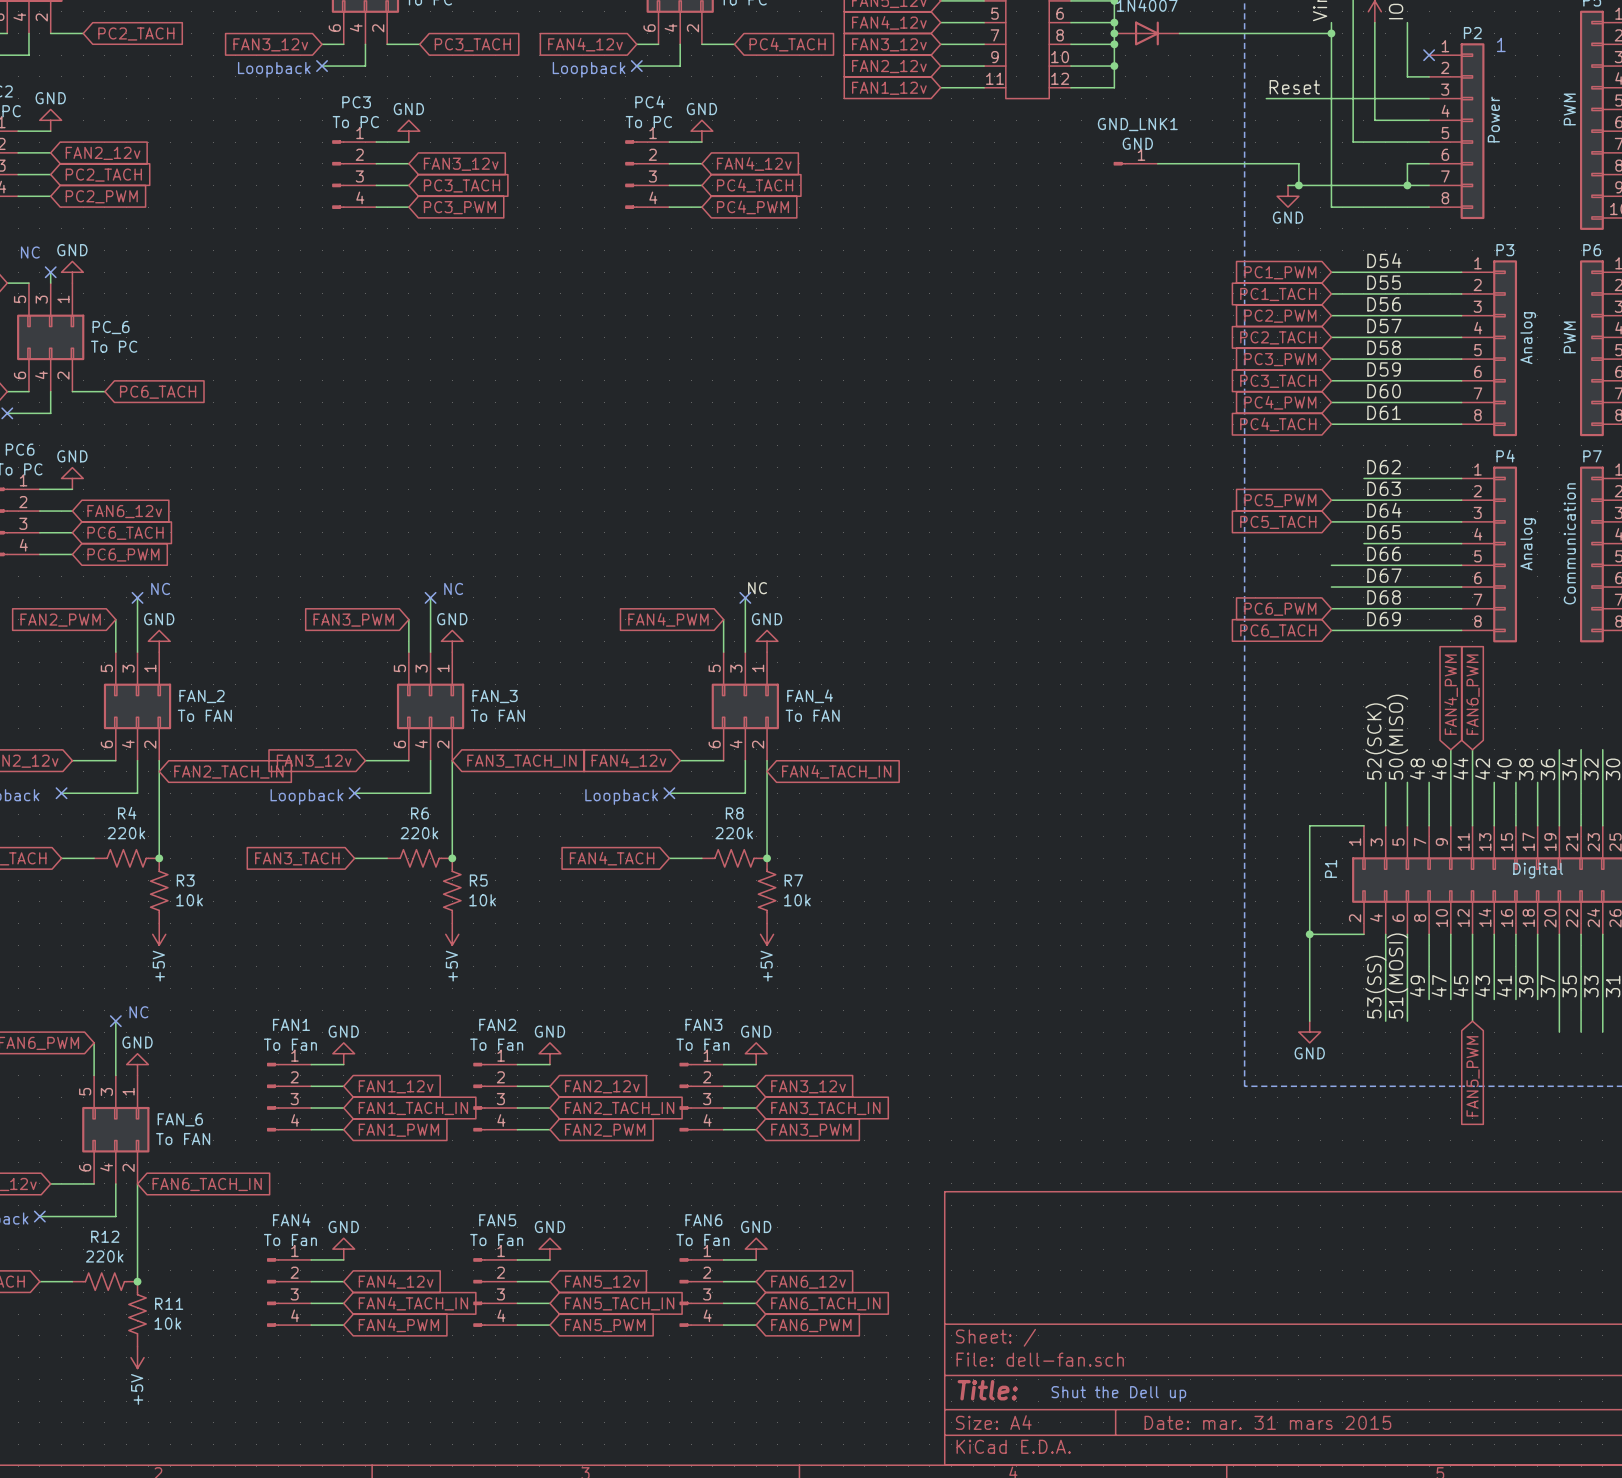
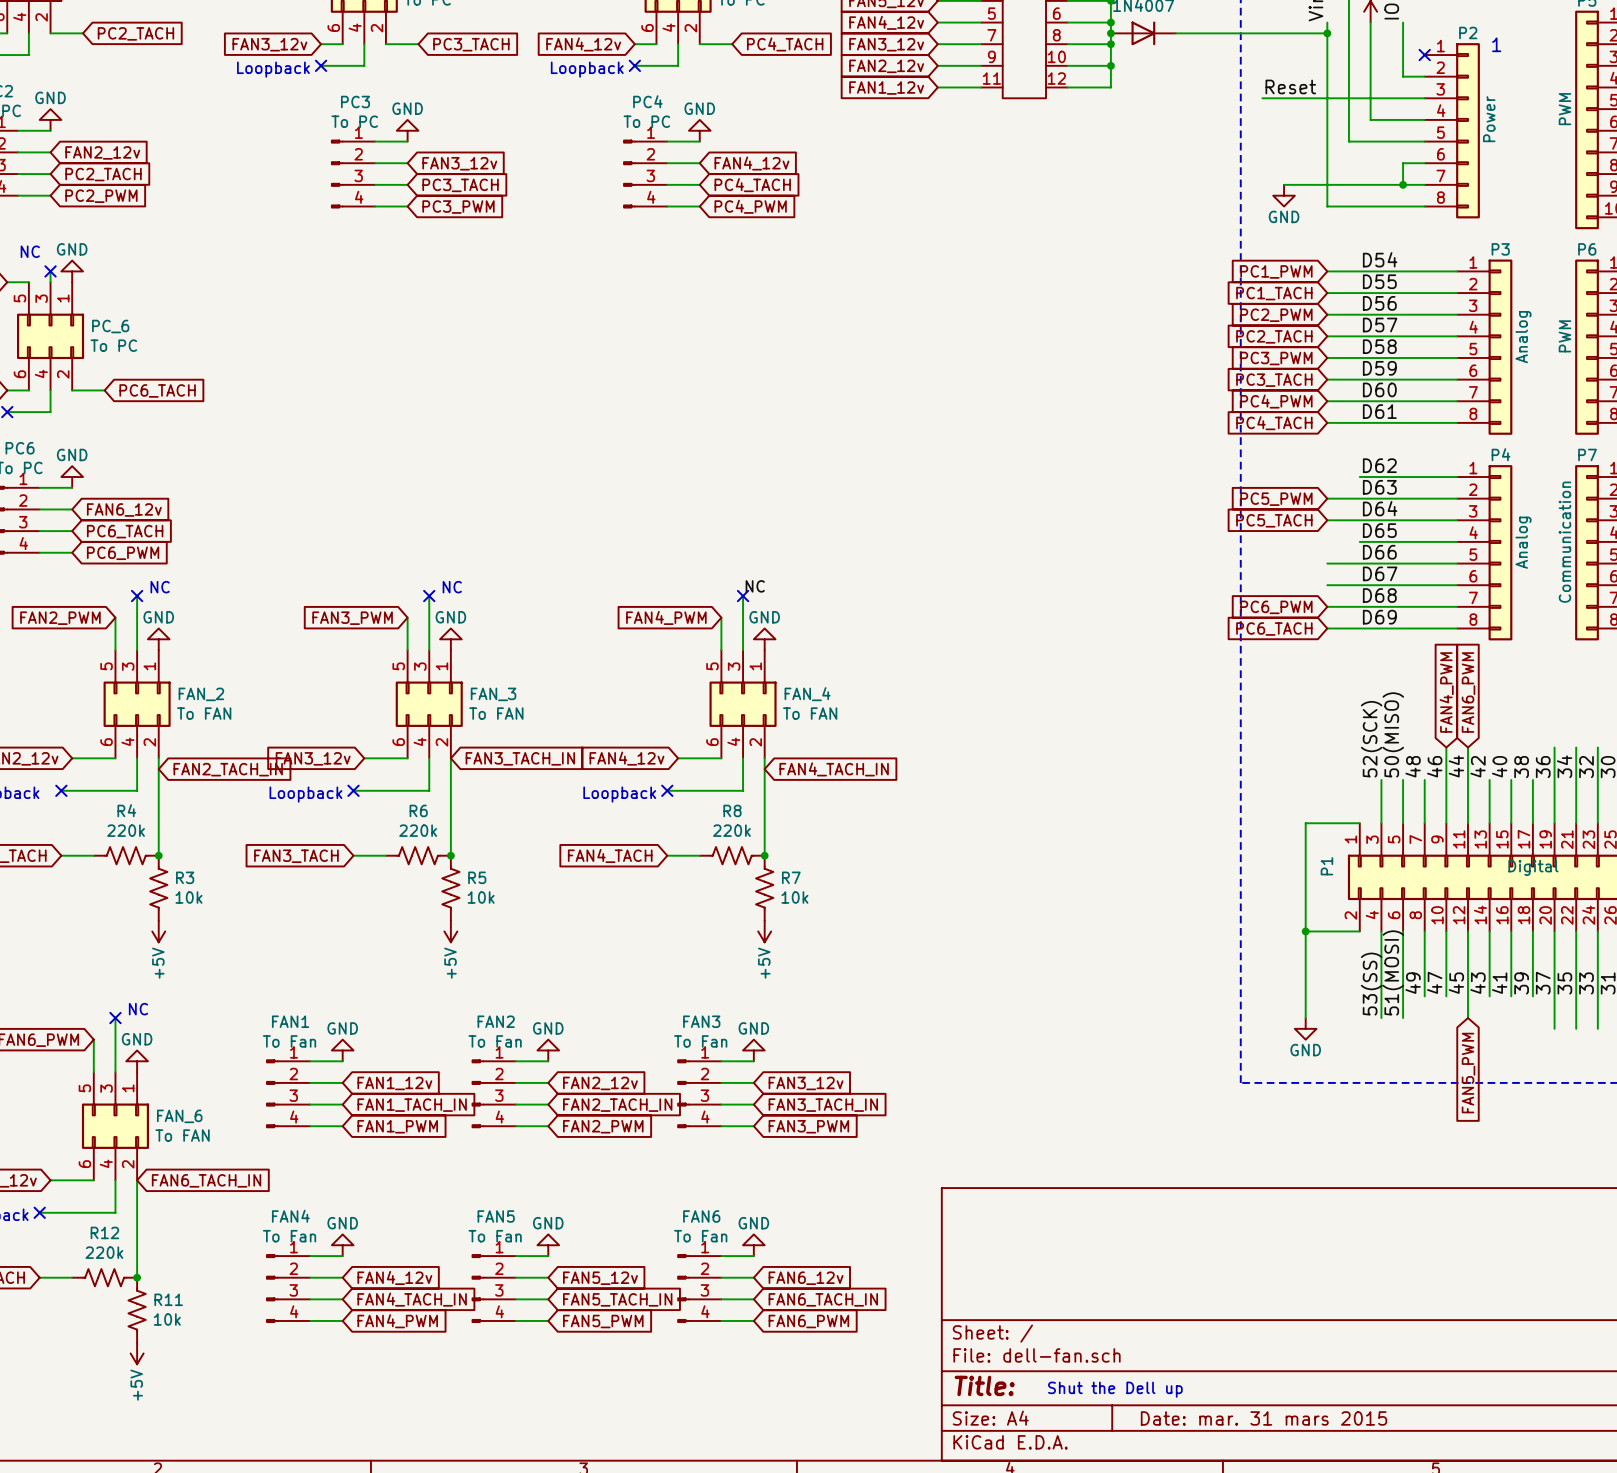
GND_LNK1: GND (1135, 163) -> none
wire: (1157, 163) (1298, 163) (1298, 185) -> none
junction: (1298, 185) -> none

